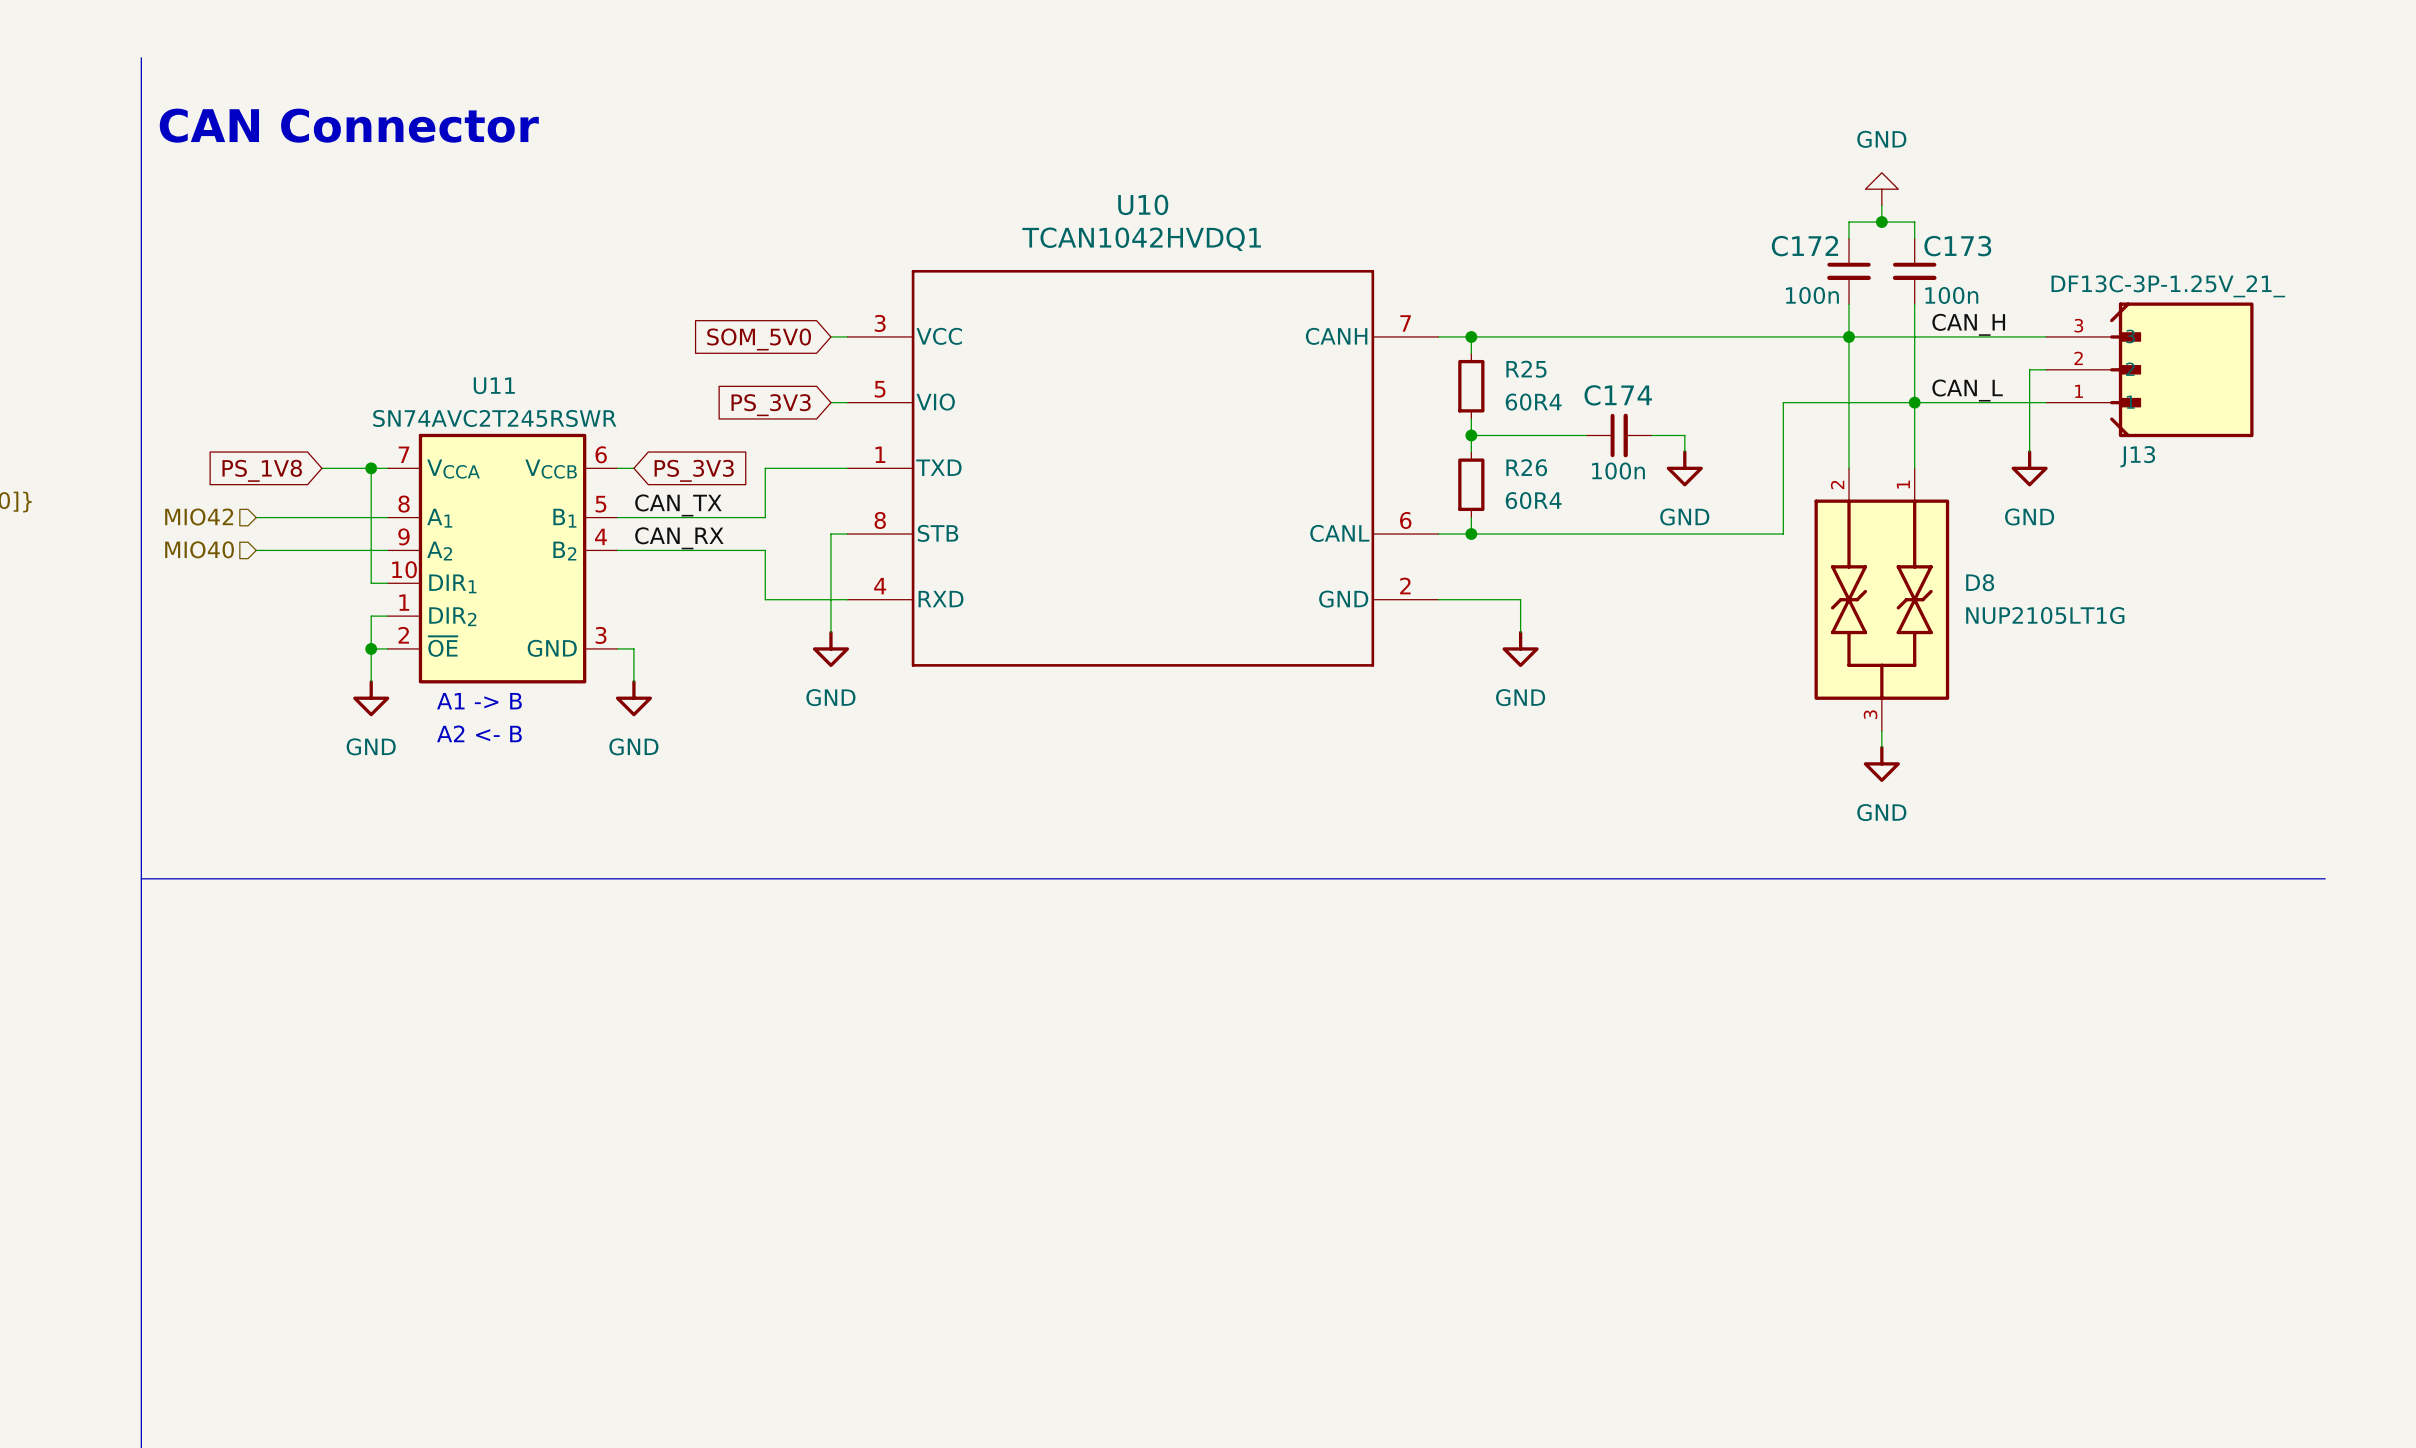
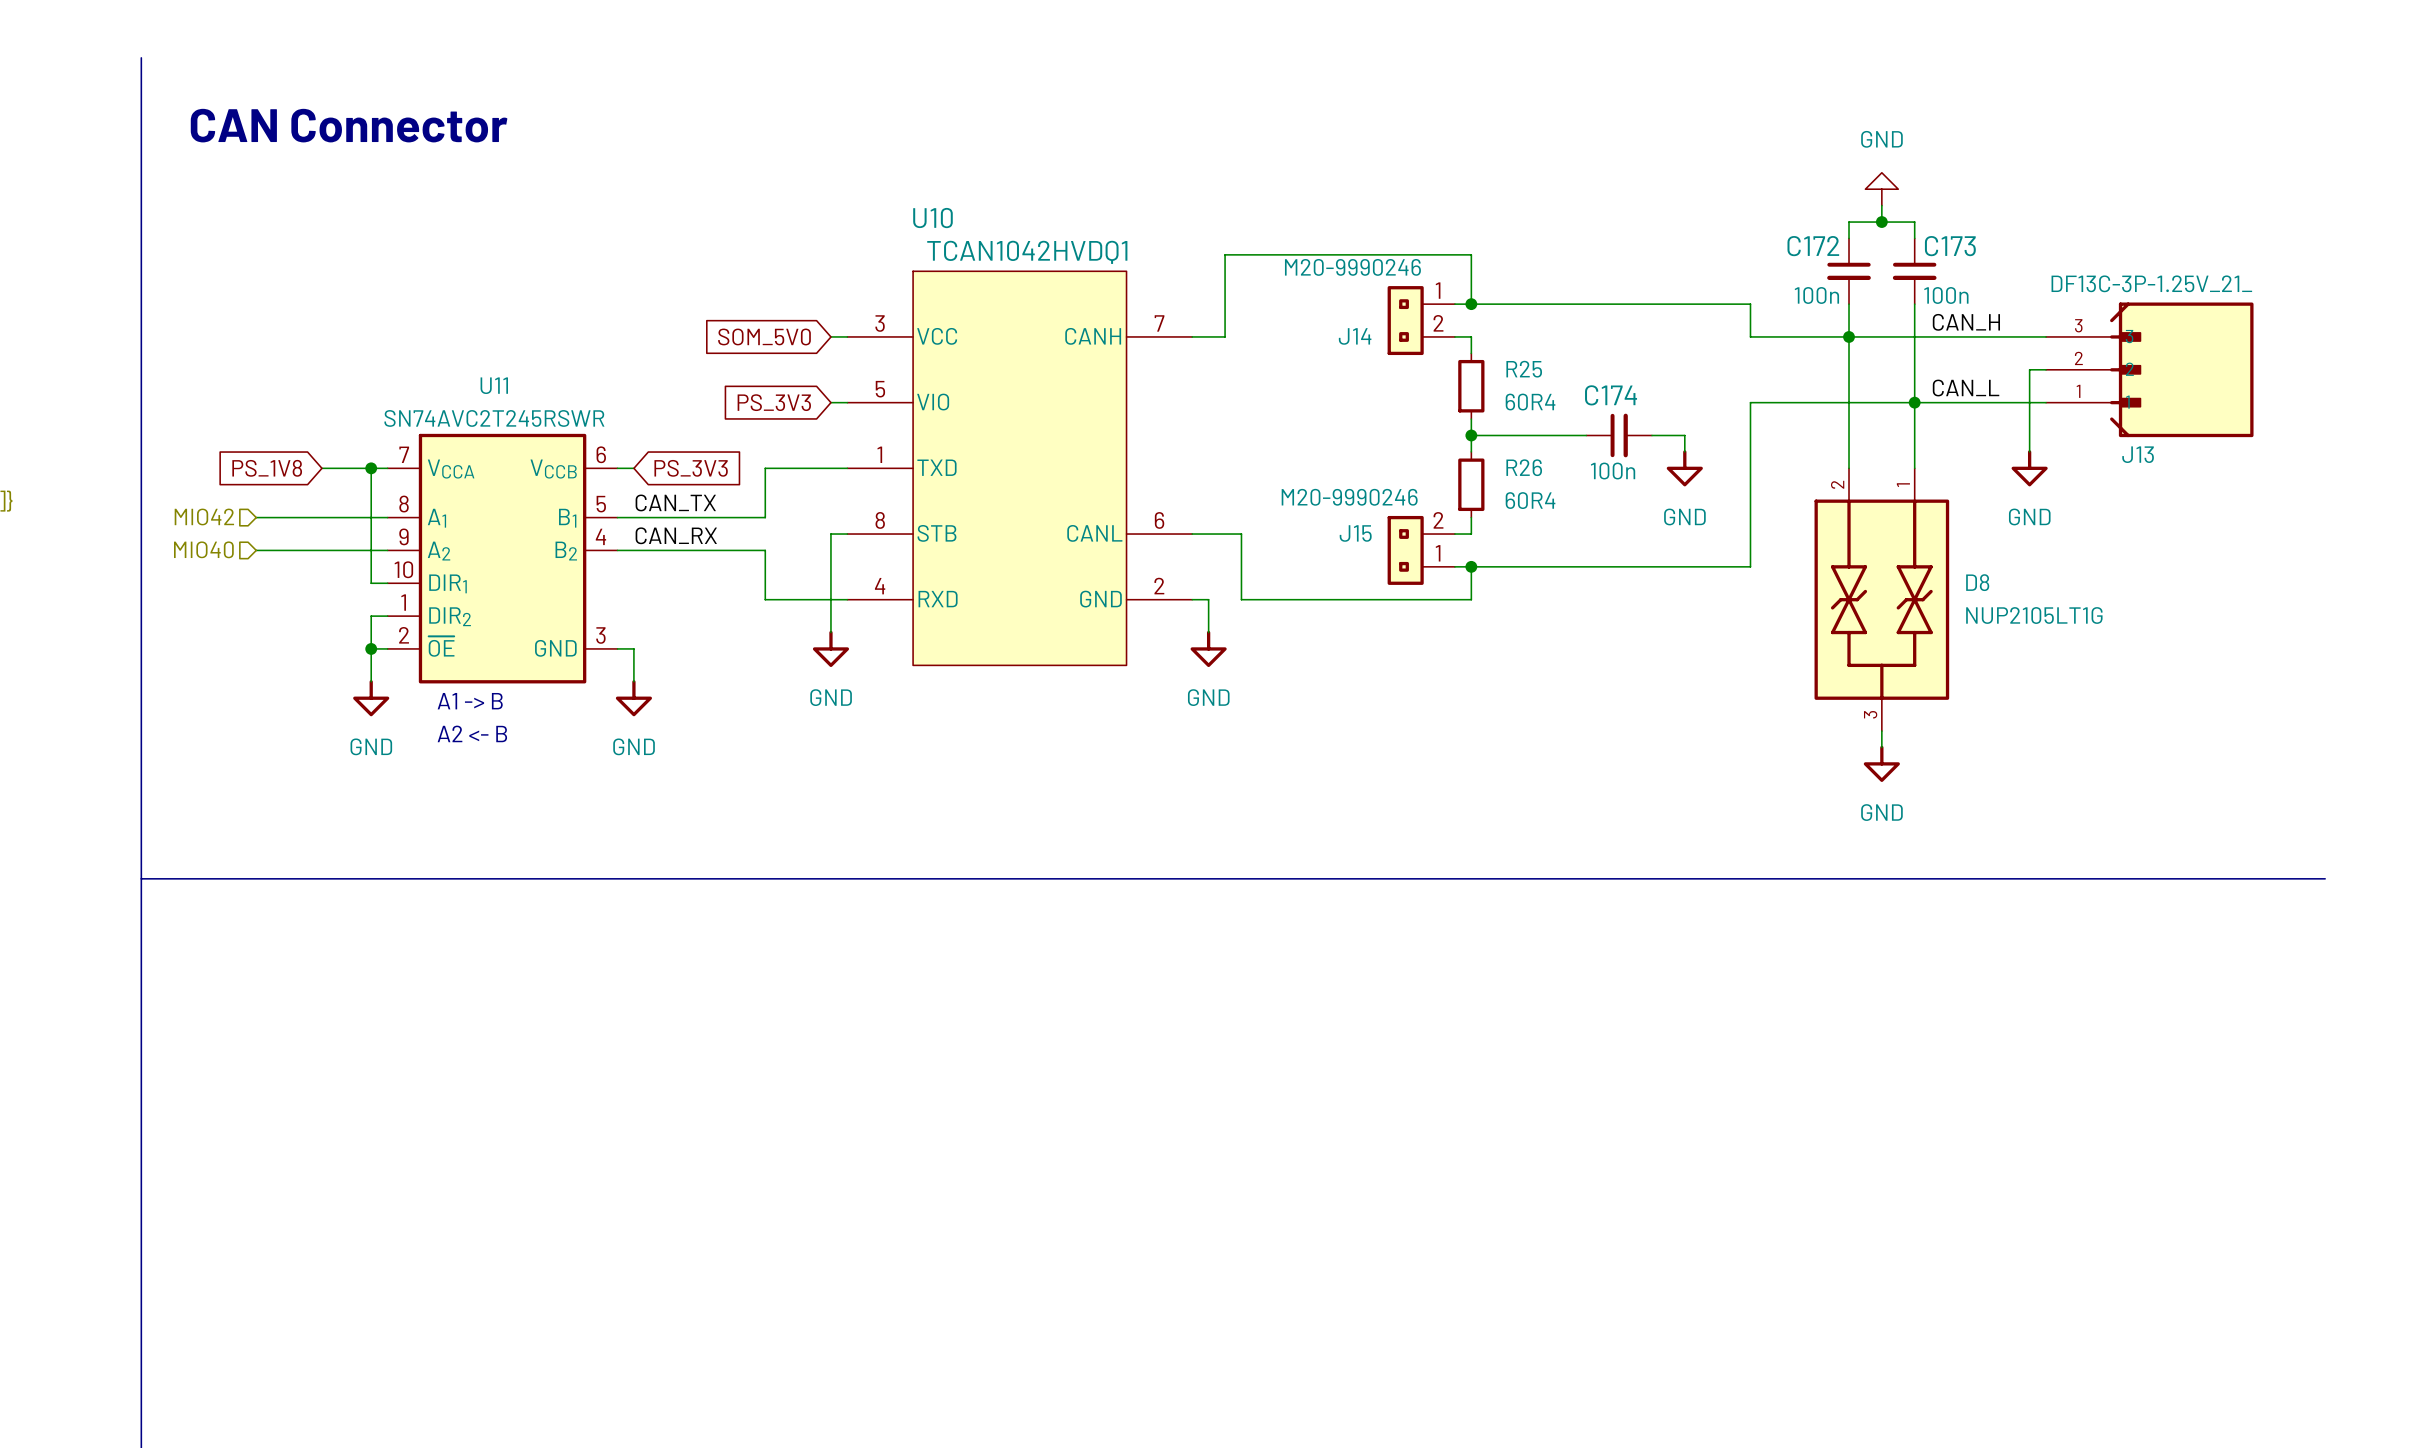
U10 name position: U10 (1143, 204) -> U10 (932, 218)
U10 symbol: [847, 269, 1439, 667] -> [847, 271, 1193, 666]
wire: none -> (1471, 304) (1471, 254) (1225, 254) (1225, 336) (1192, 336)
J14: none -> (1421, 320)
wire: (1471, 336) (1750, 336) -> (1454, 304) (1750, 304) (1750, 336)
junction position: (1471, 336) -> (1471, 304)
wire: (1783, 402) (1783, 534) (1471, 534) -> (1783, 402) (1750, 402) (1750, 566) (1454, 566)
wire: none -> (1192, 534) (1241, 534) (1241, 599) (1438, 599)
junction position: (1471, 534) -> (1471, 566)
J15: none -> (1421, 550)
wire: none -> (1192, 599) (1208, 599) (1208, 632)
wire: (1471, 599) (1520, 599) (1520, 632) -> (1471, 599) (1471, 566)
power symbol position: GND (1520, 648) -> GND (1208, 648)

